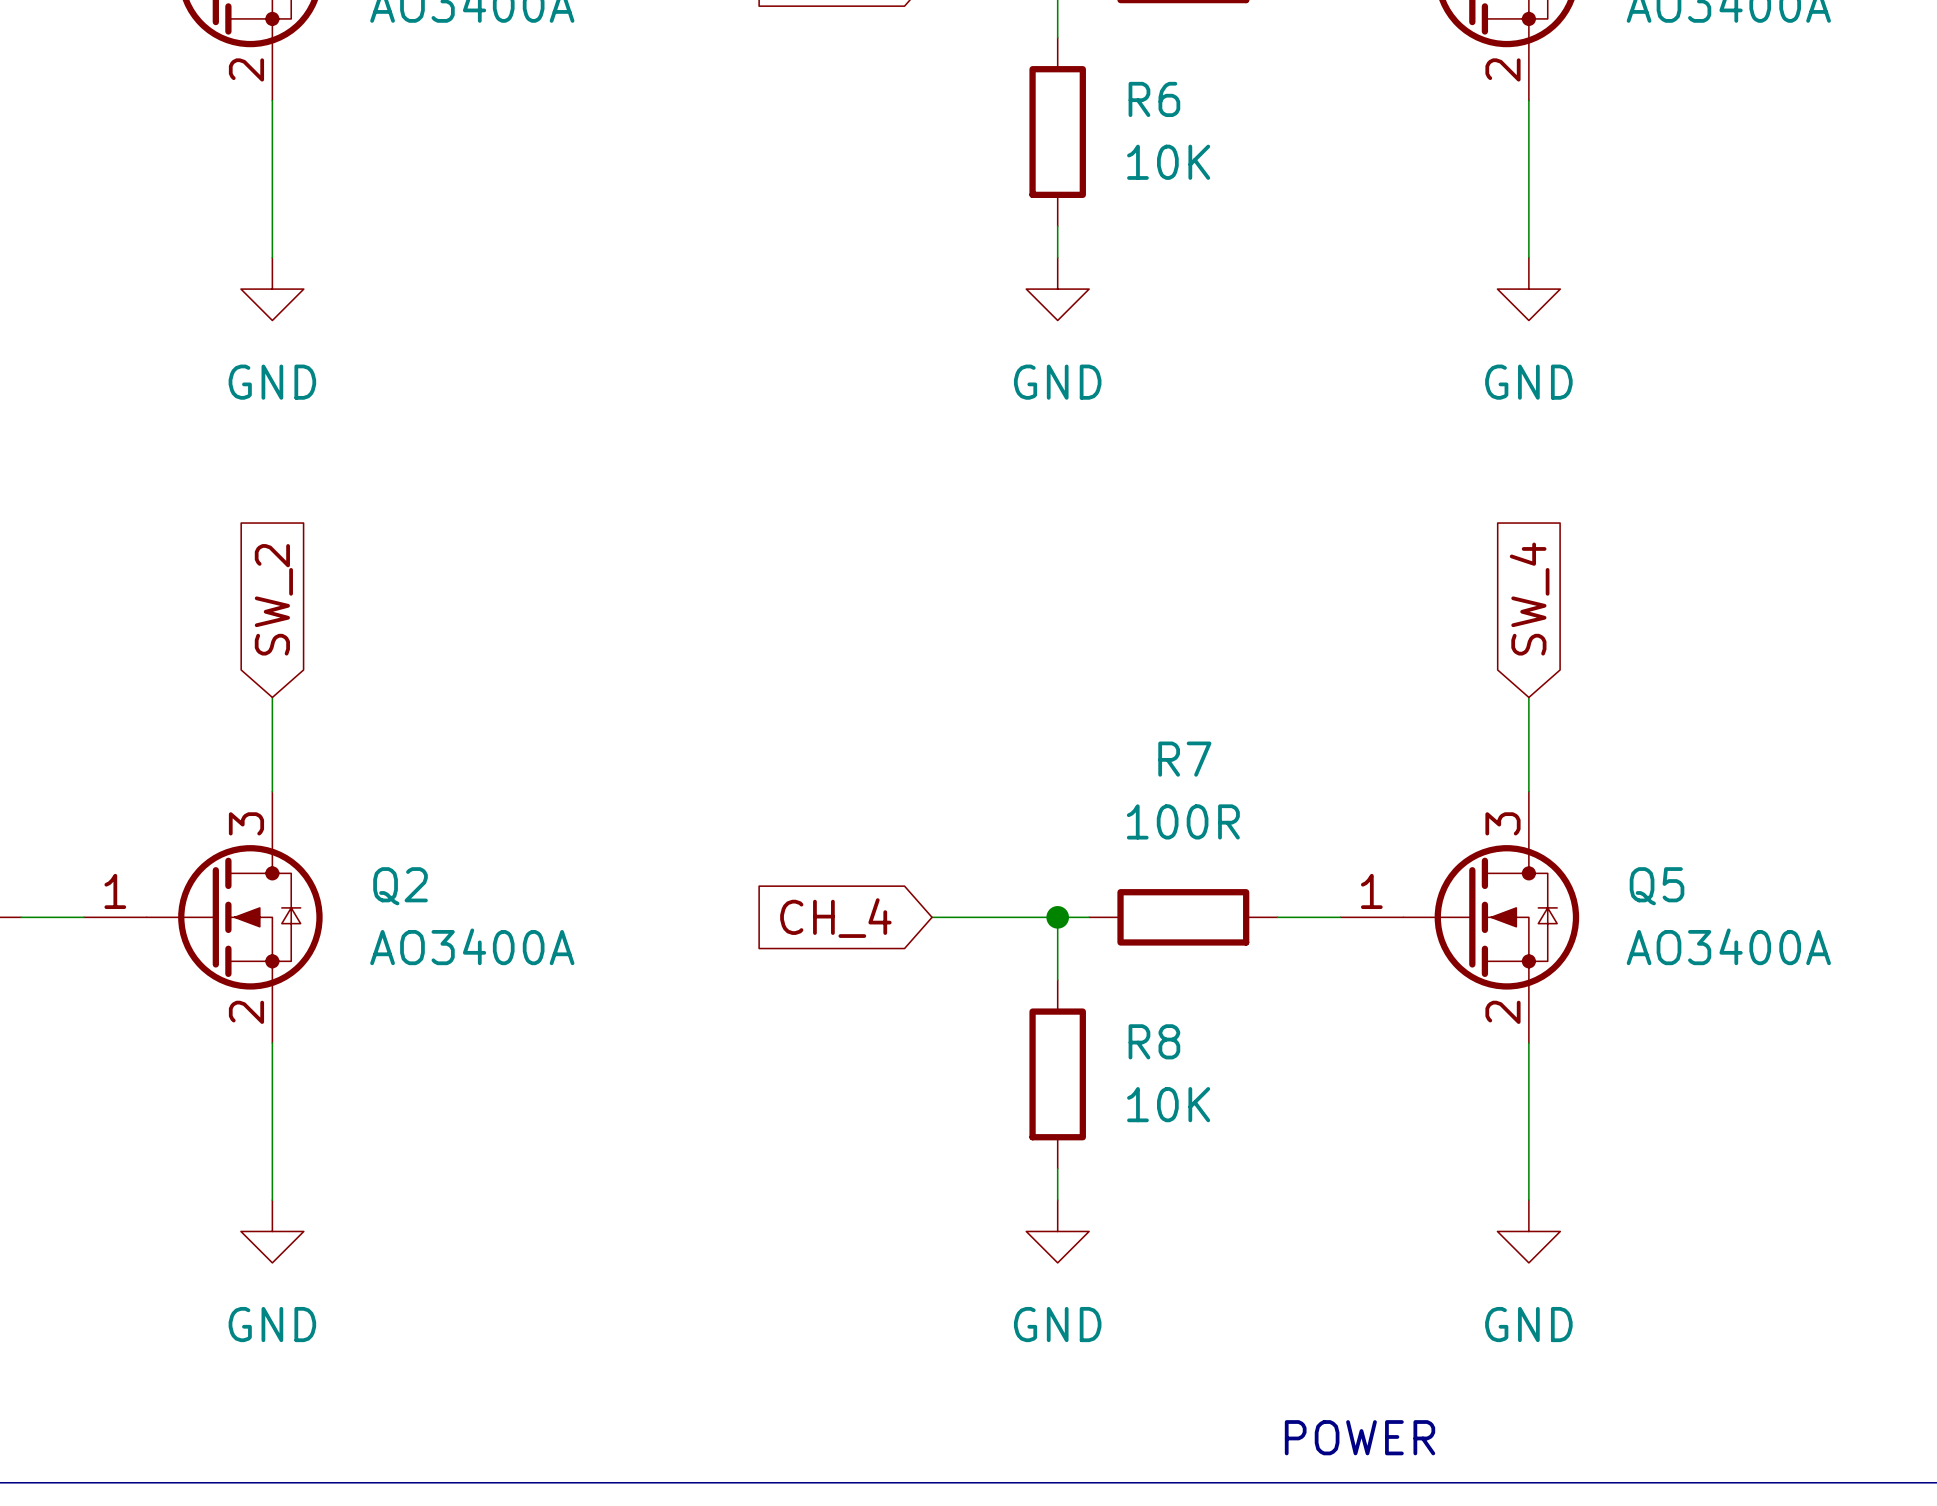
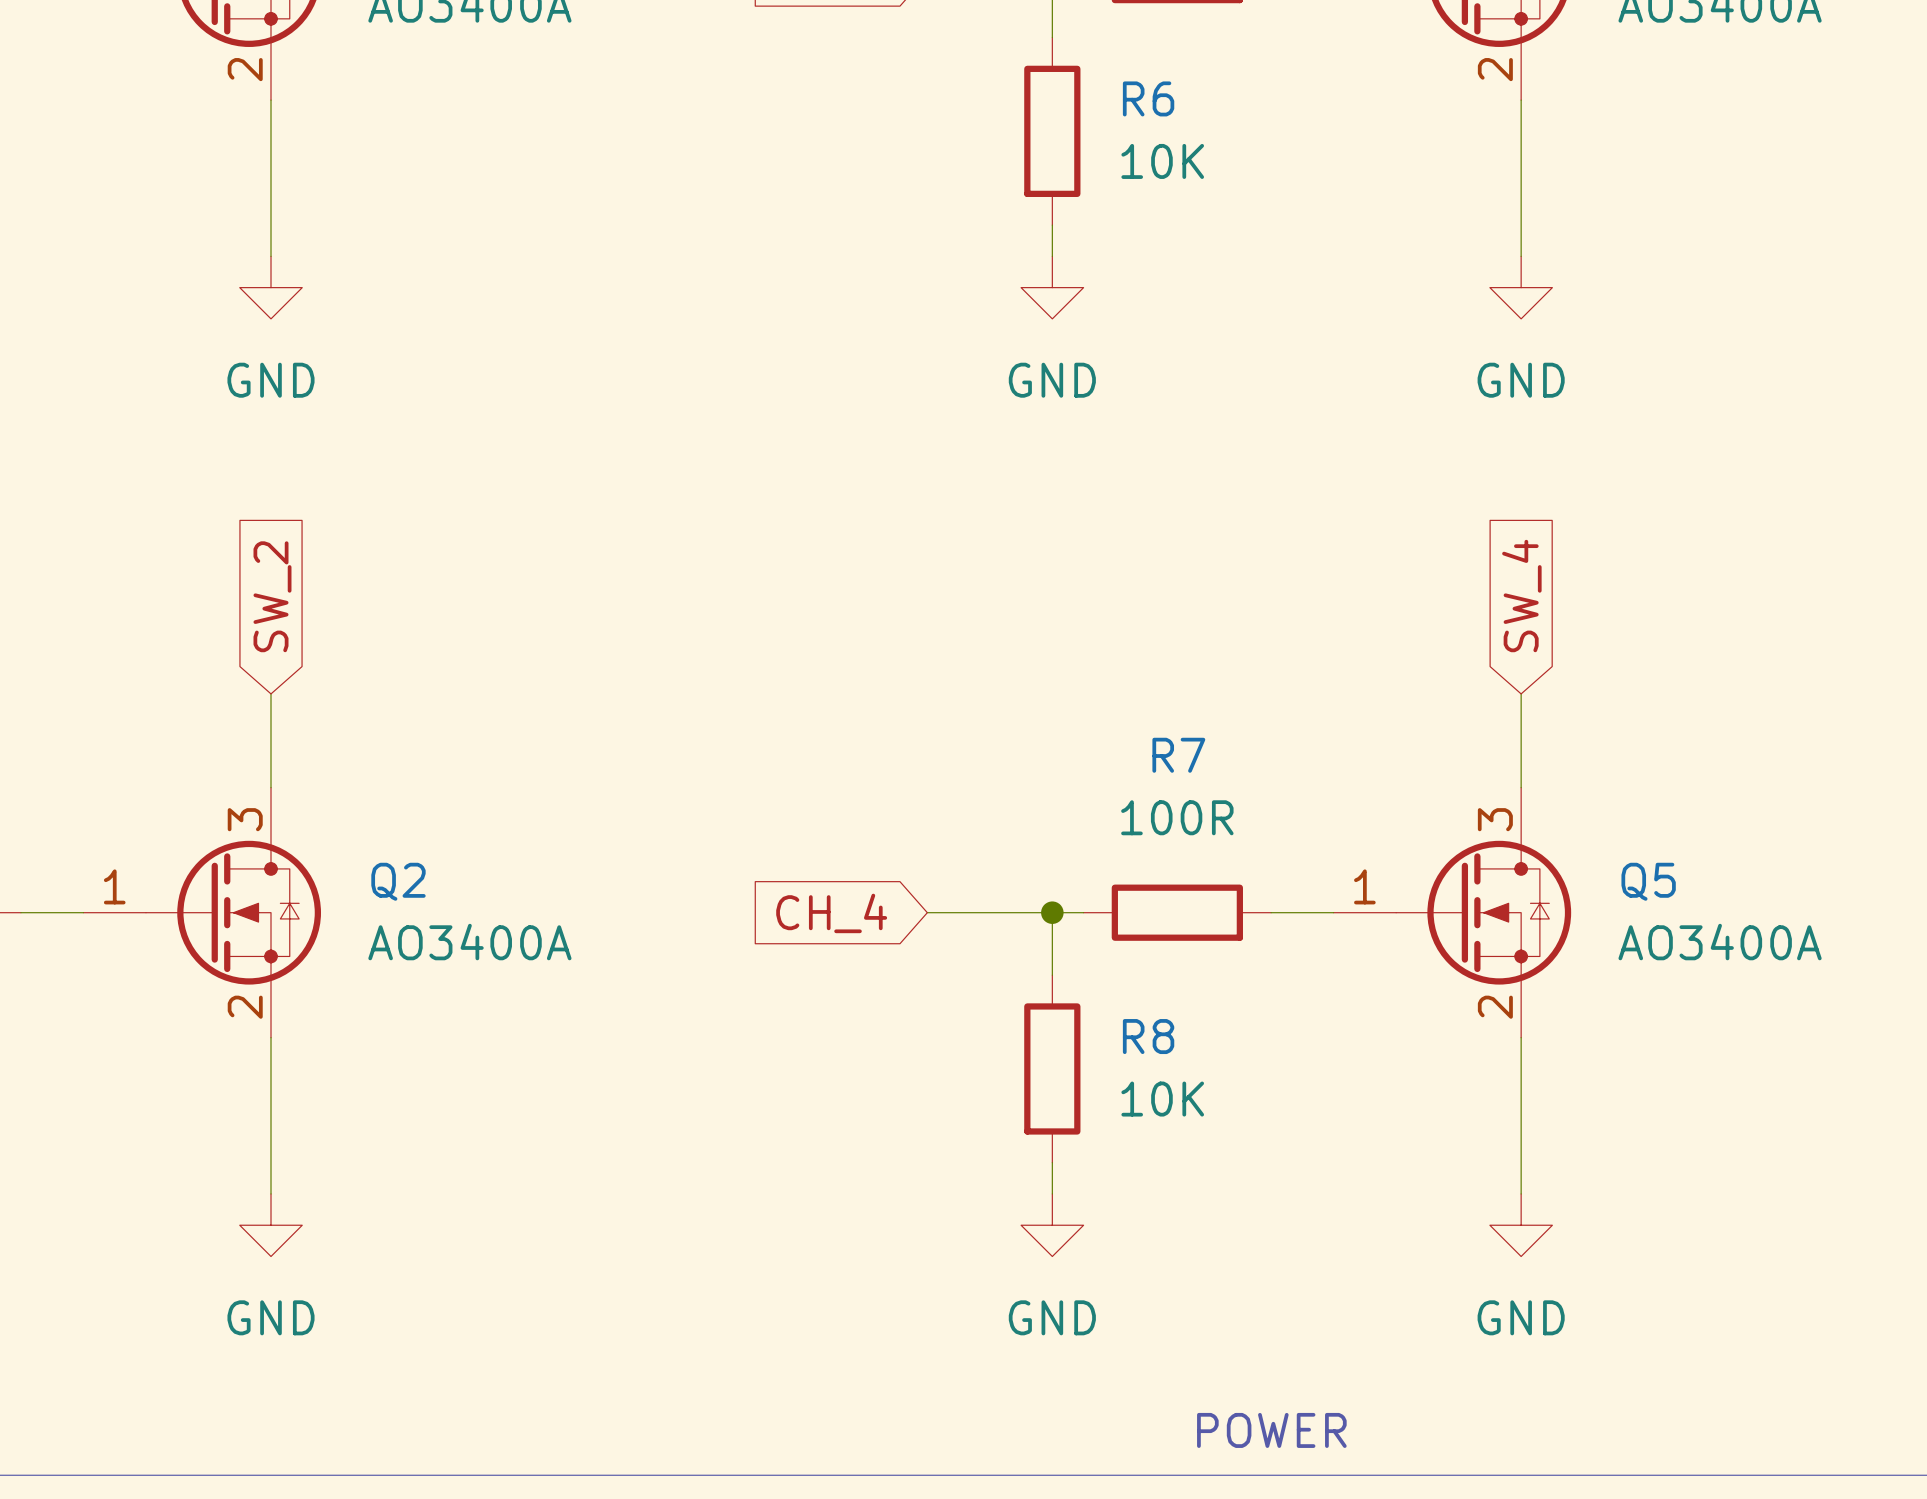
text position: POWER (1360, 1437) -> POWER (1271, 1430)

